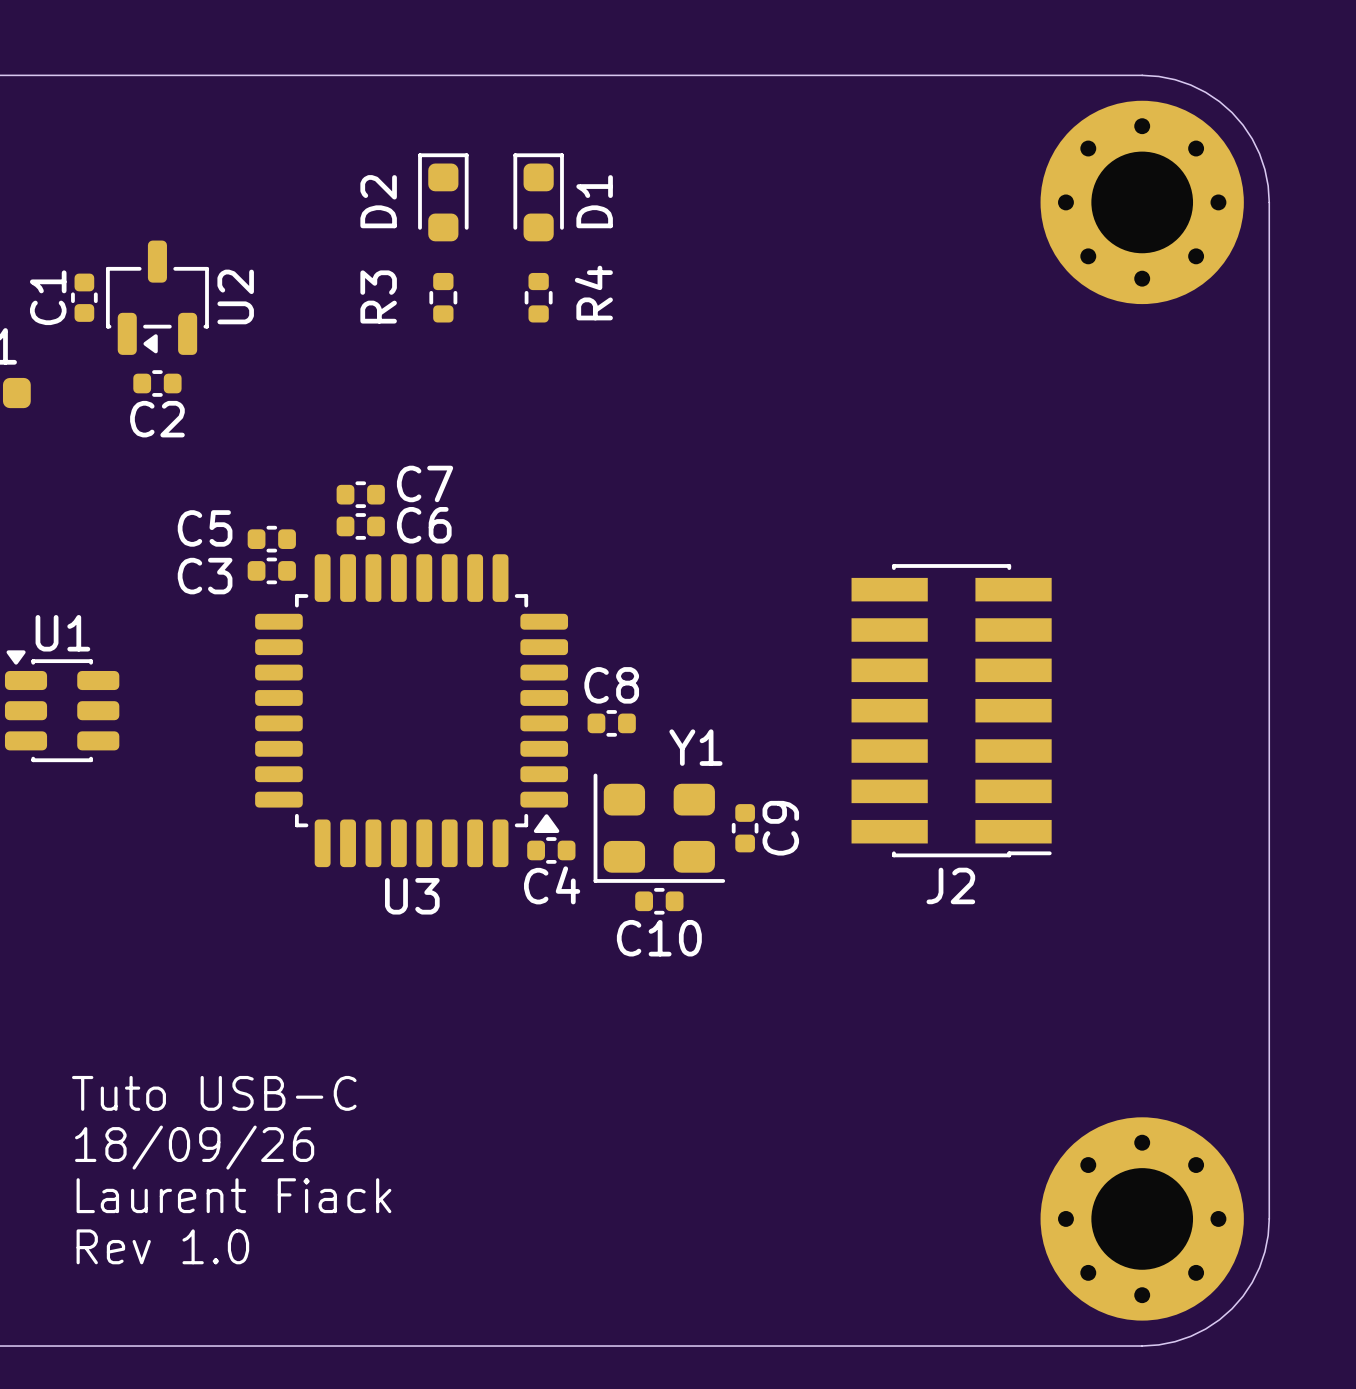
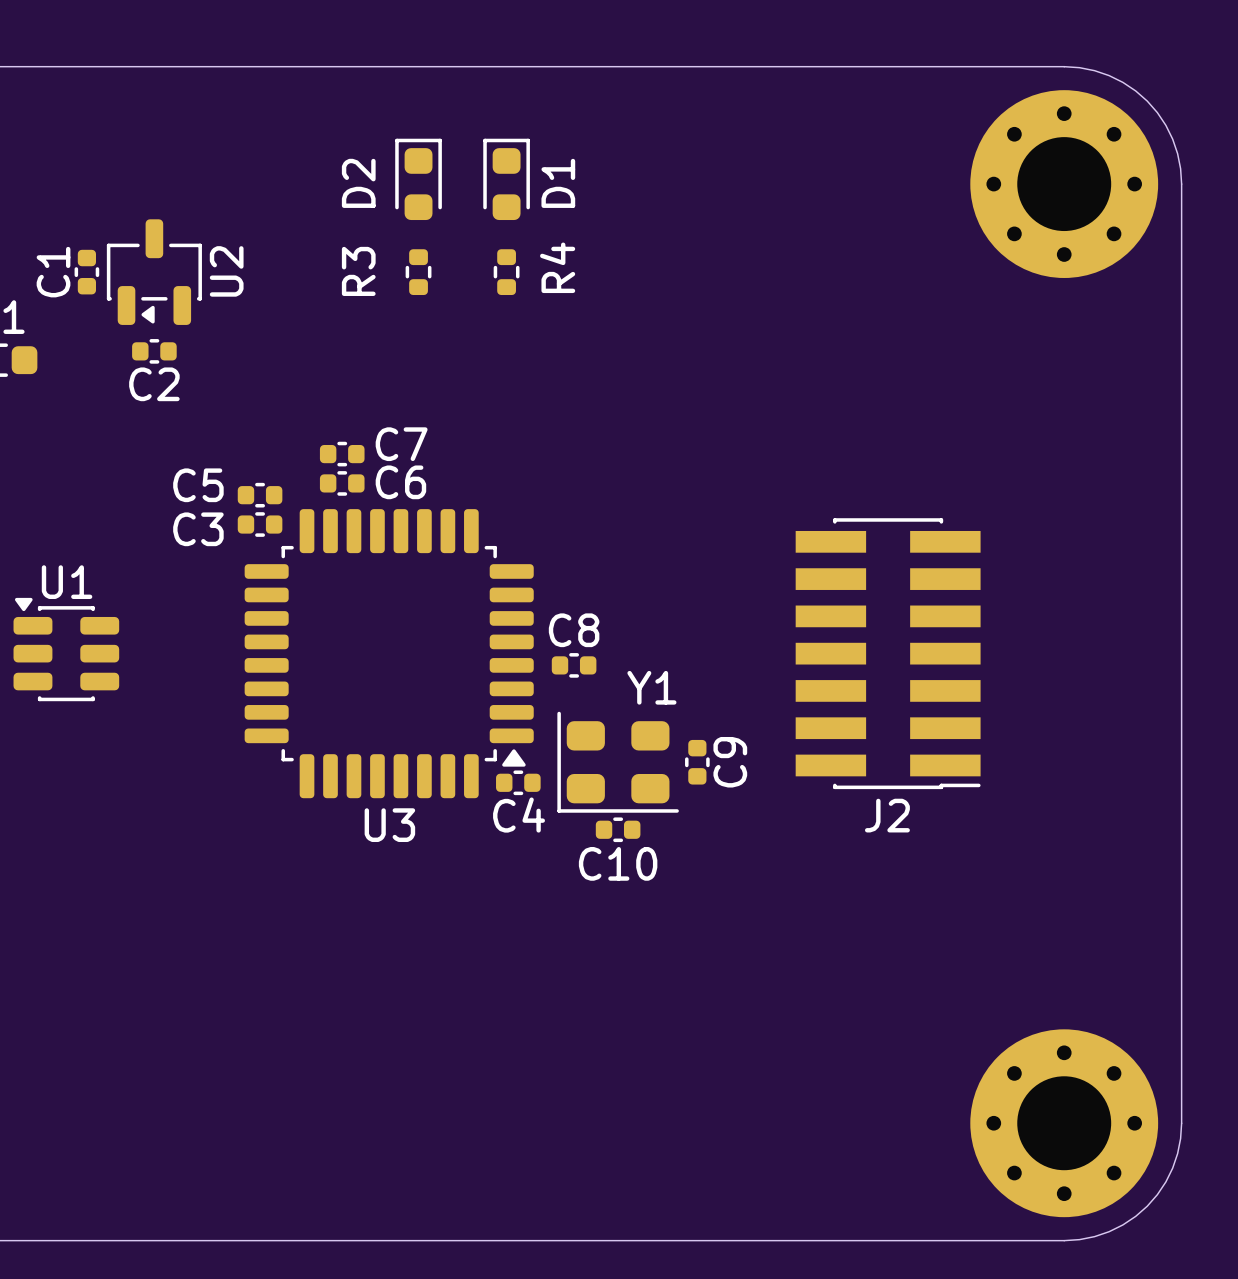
text: Tuto USB-C (214, 1093) -> none
text: 18/09/26 (194, 1147) -> none
text: Laurent Fiack (233, 1195) -> none
text: Rev 1.0 (162, 1246) -> none

